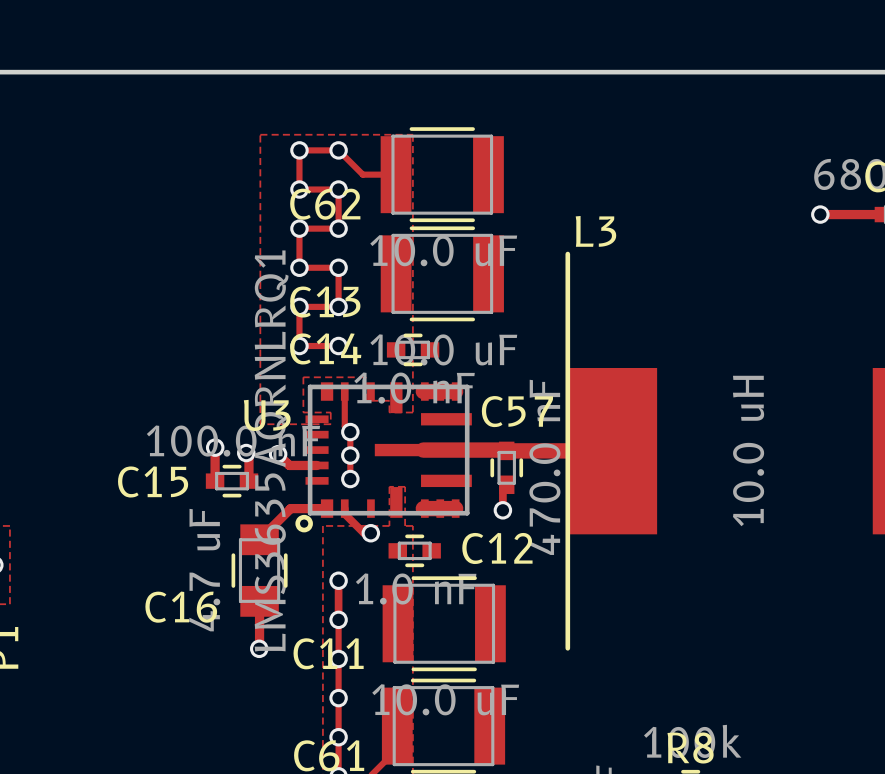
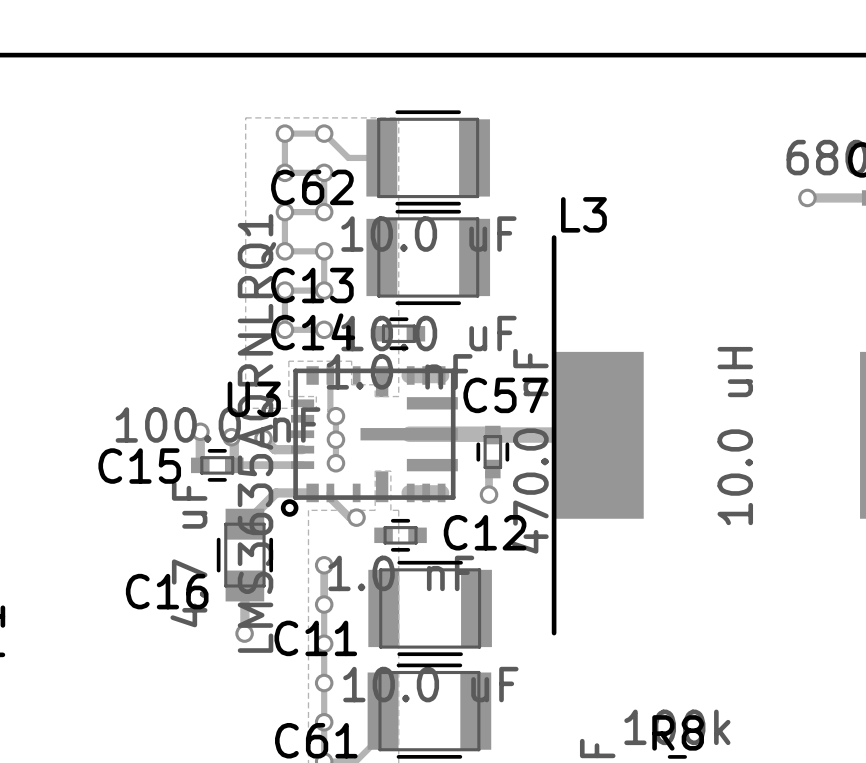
track: none -> (234, 465) (302, 465)

